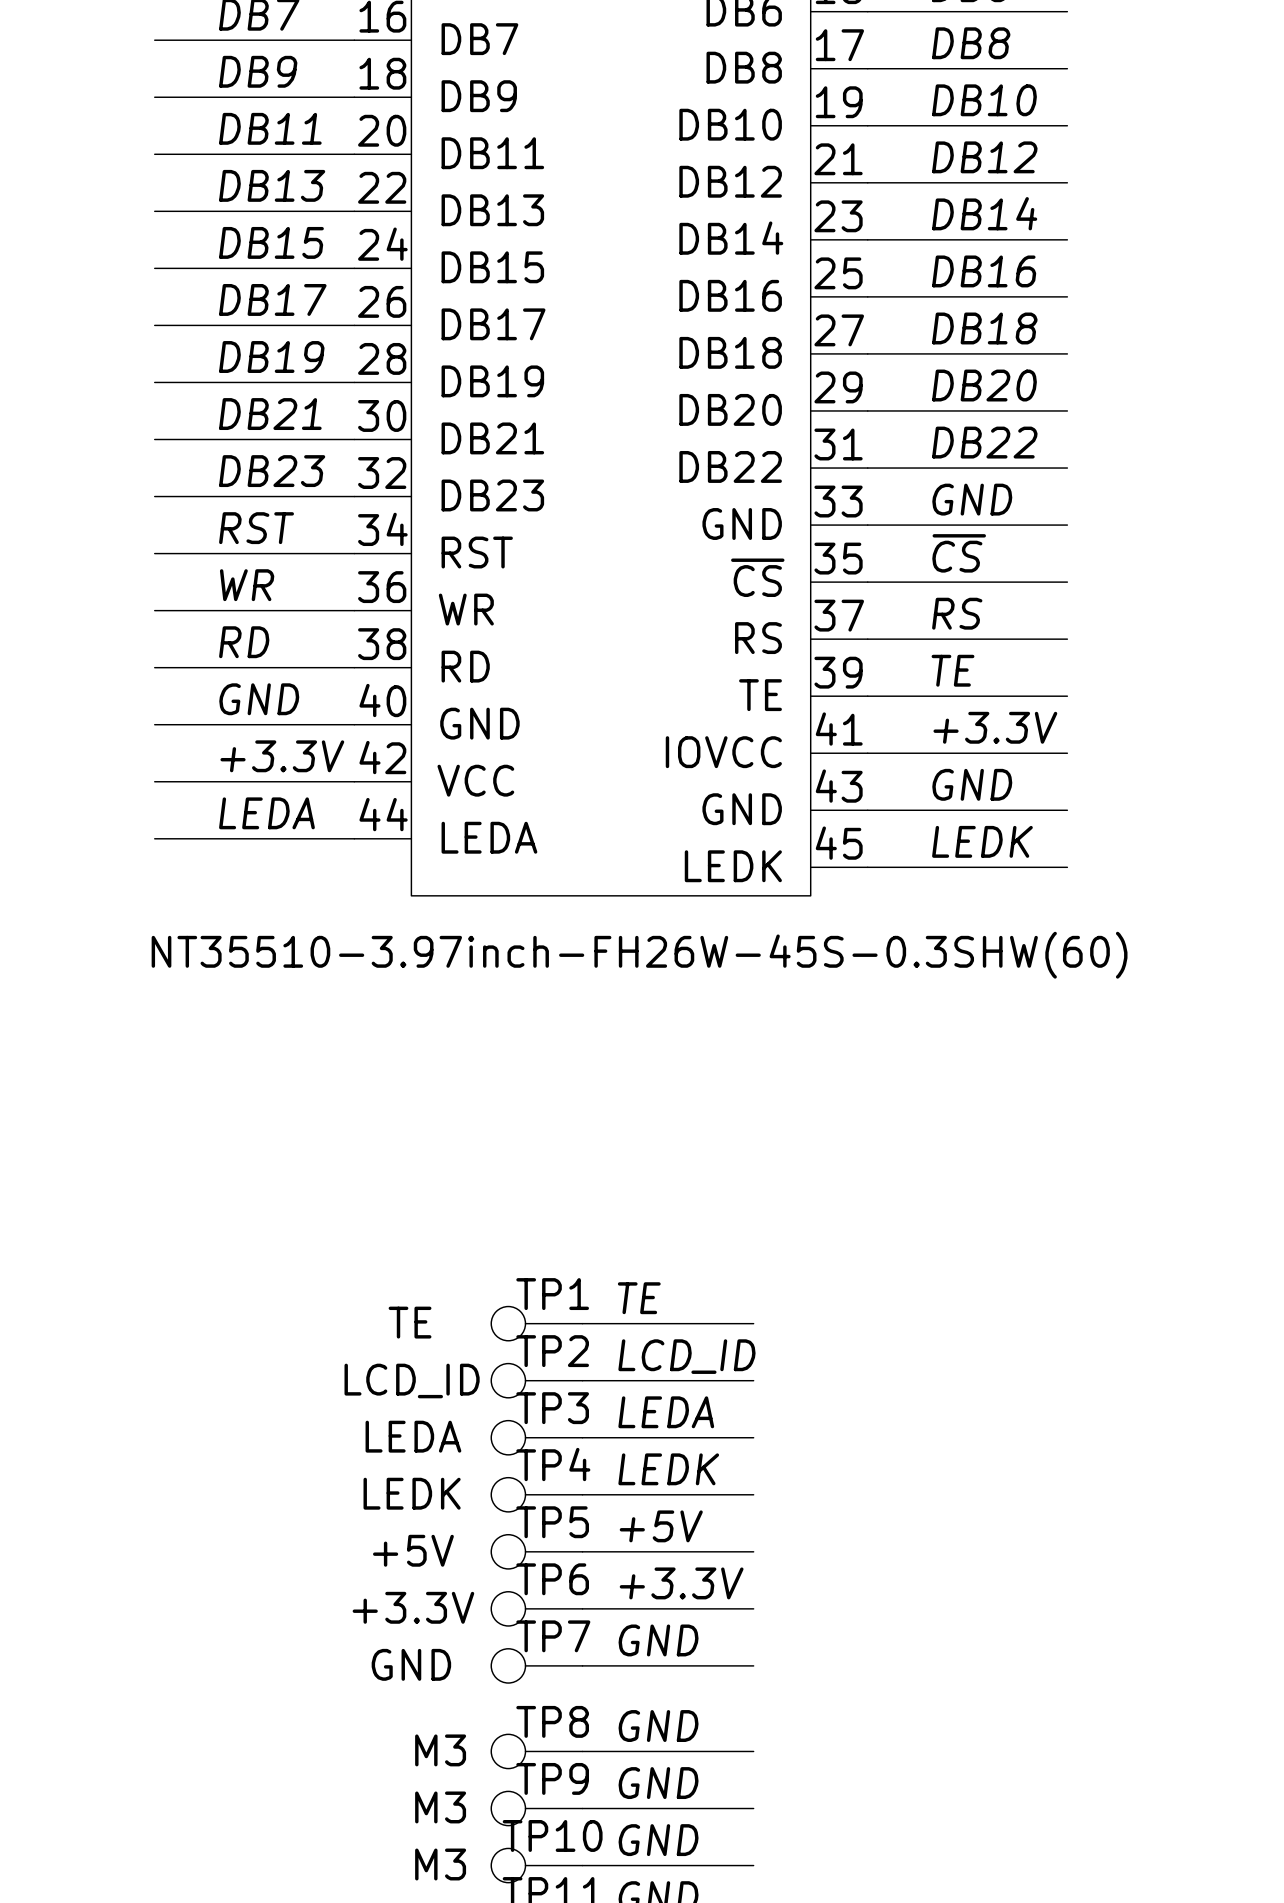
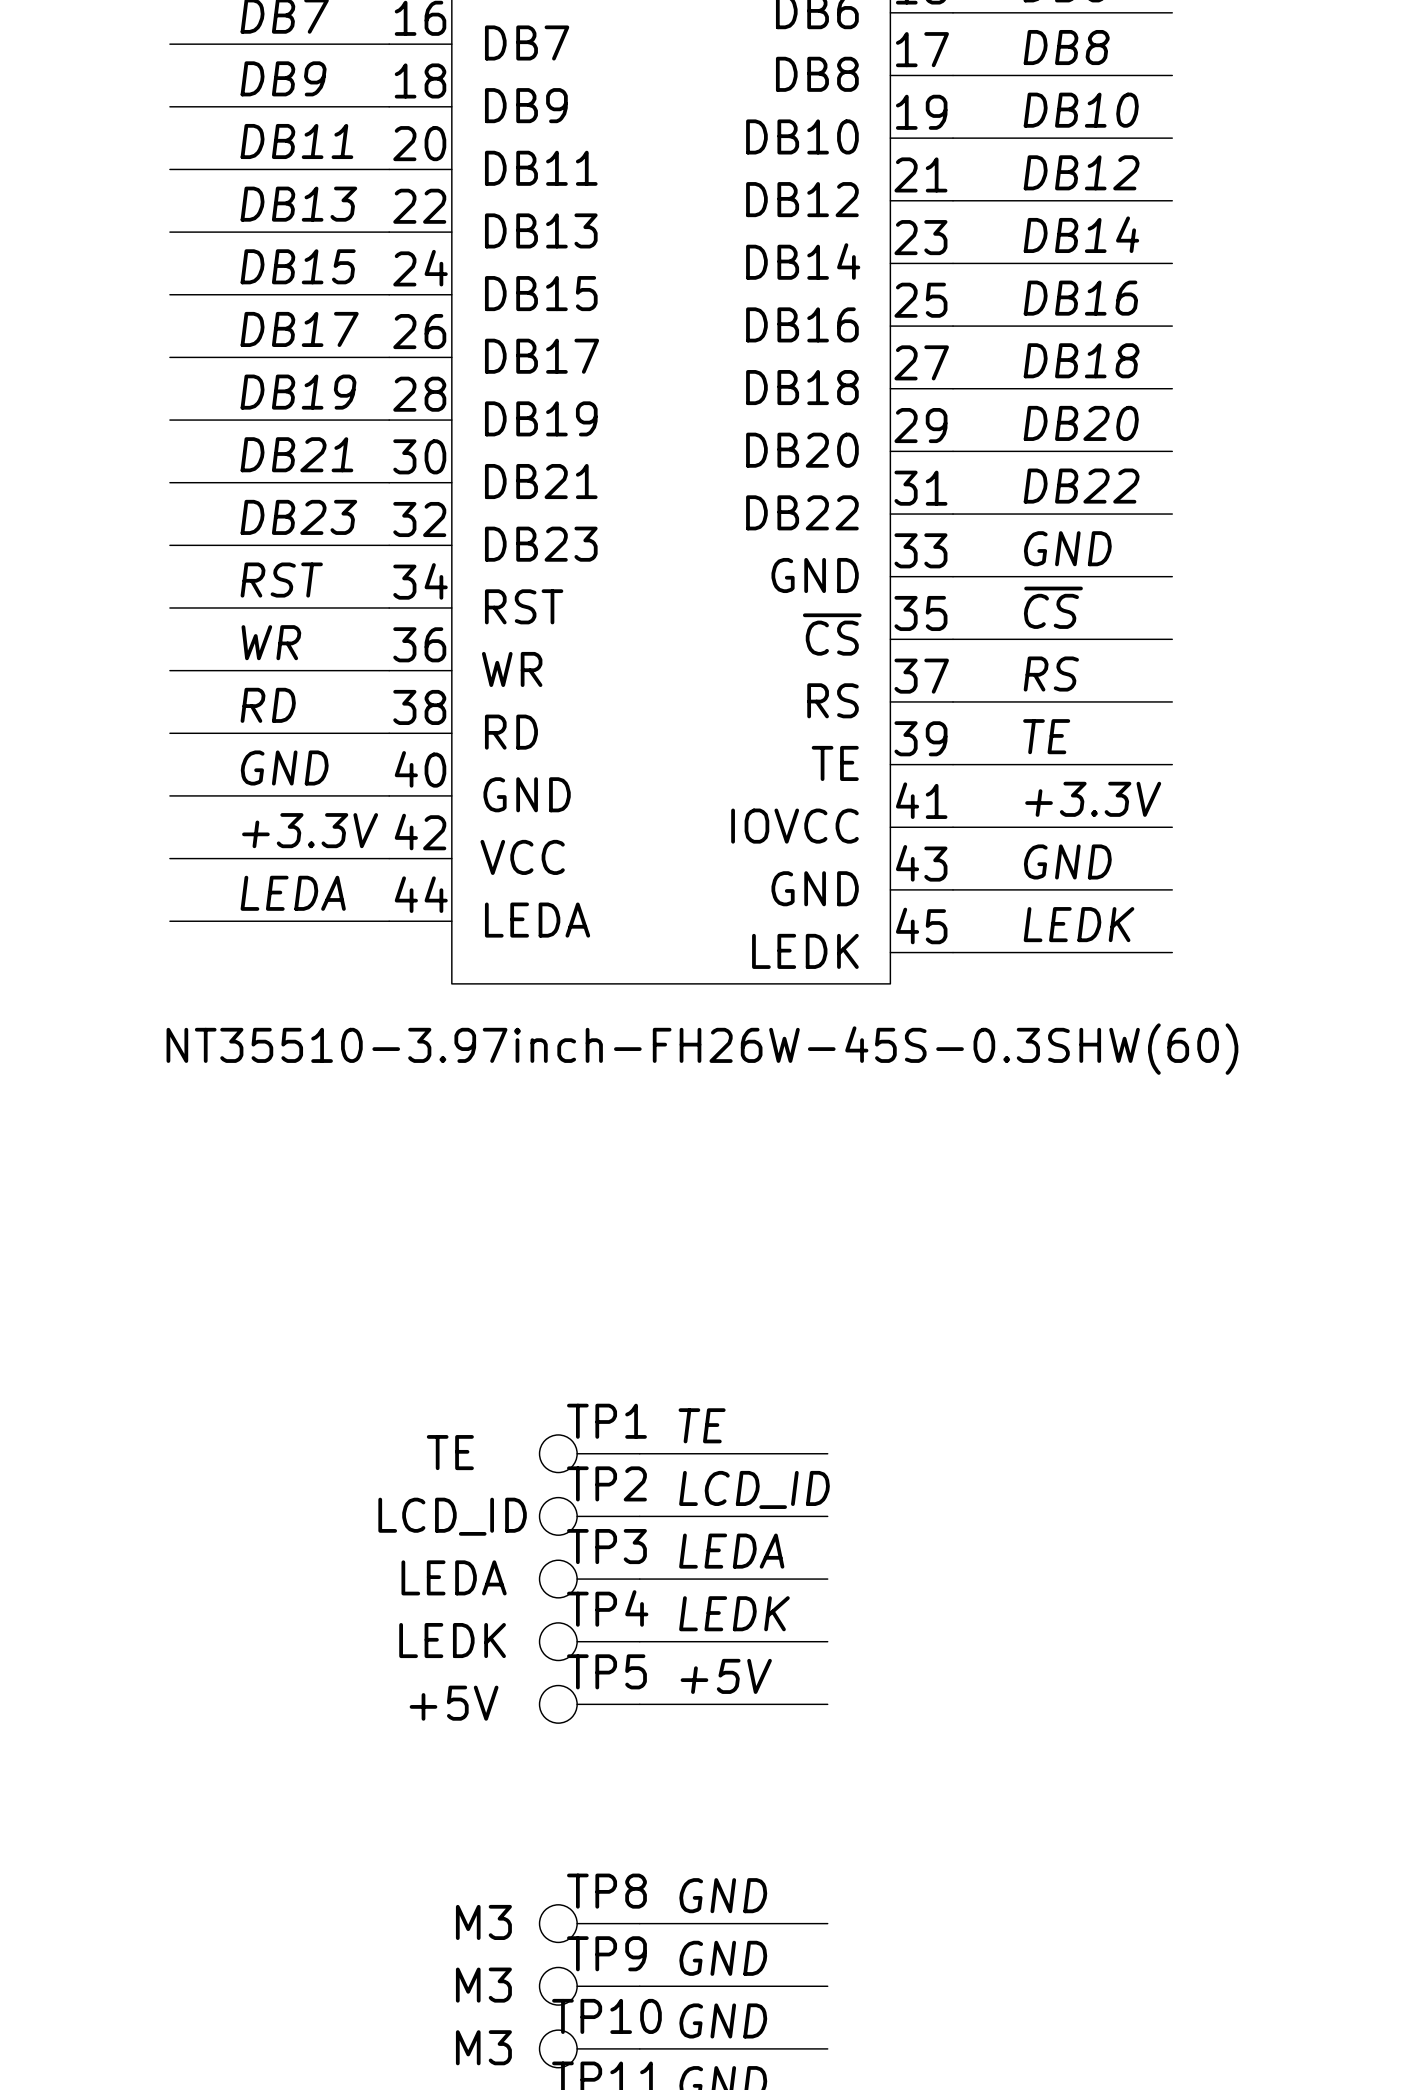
label: +3.3V (681, 1583) -> none
TP6: +3.3V (536, 1608) -> none
wire: (582, 1608) (753, 1608) -> none
label: GND (658, 1640) -> none
TP7: GND (536, 1665) -> none
wire: (582, 1665) (753, 1665) -> none

